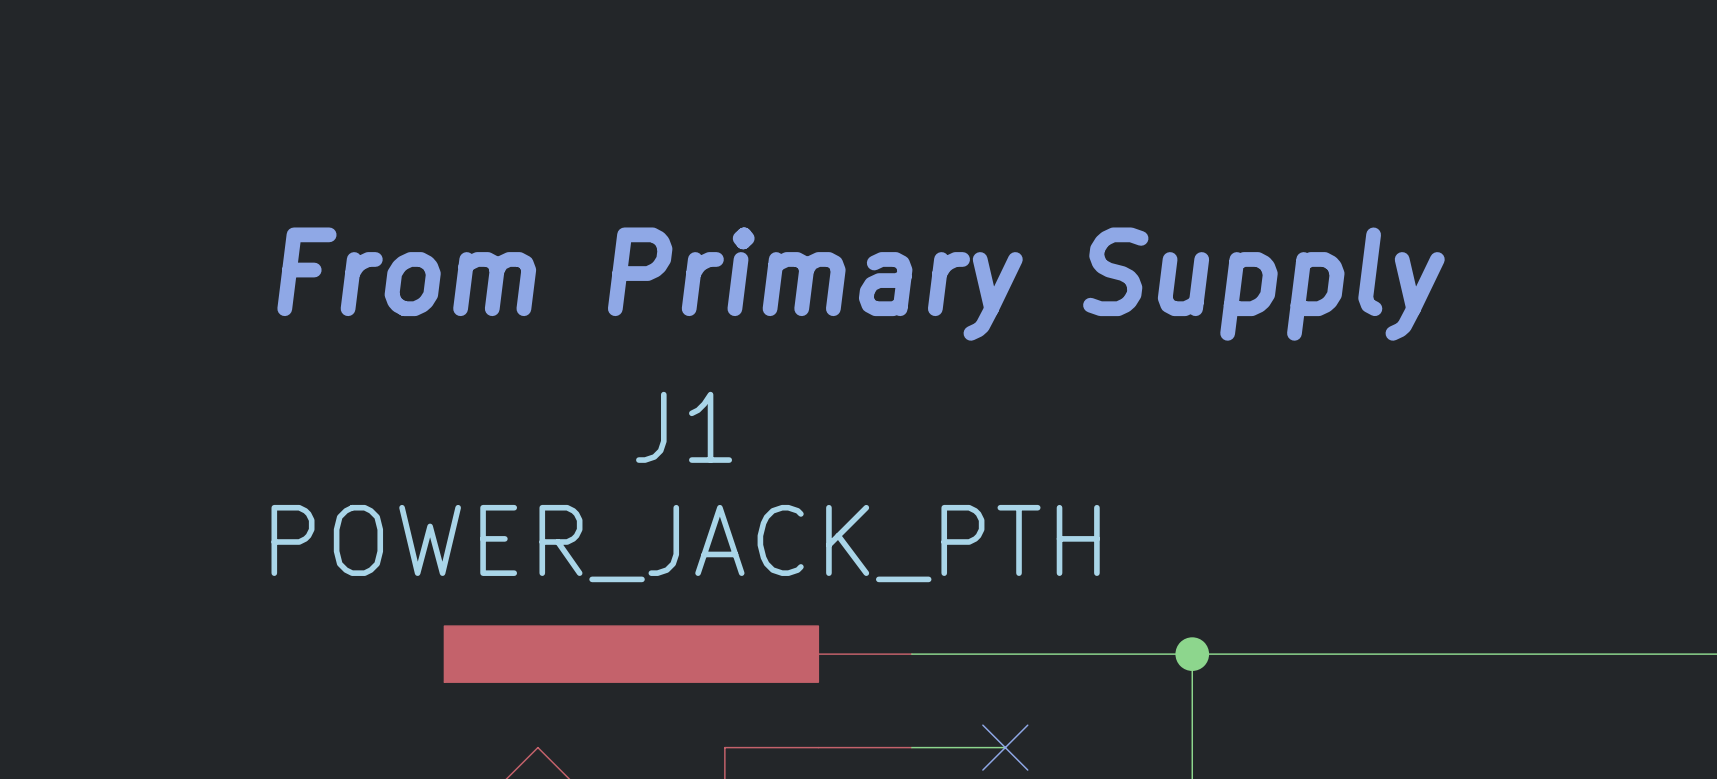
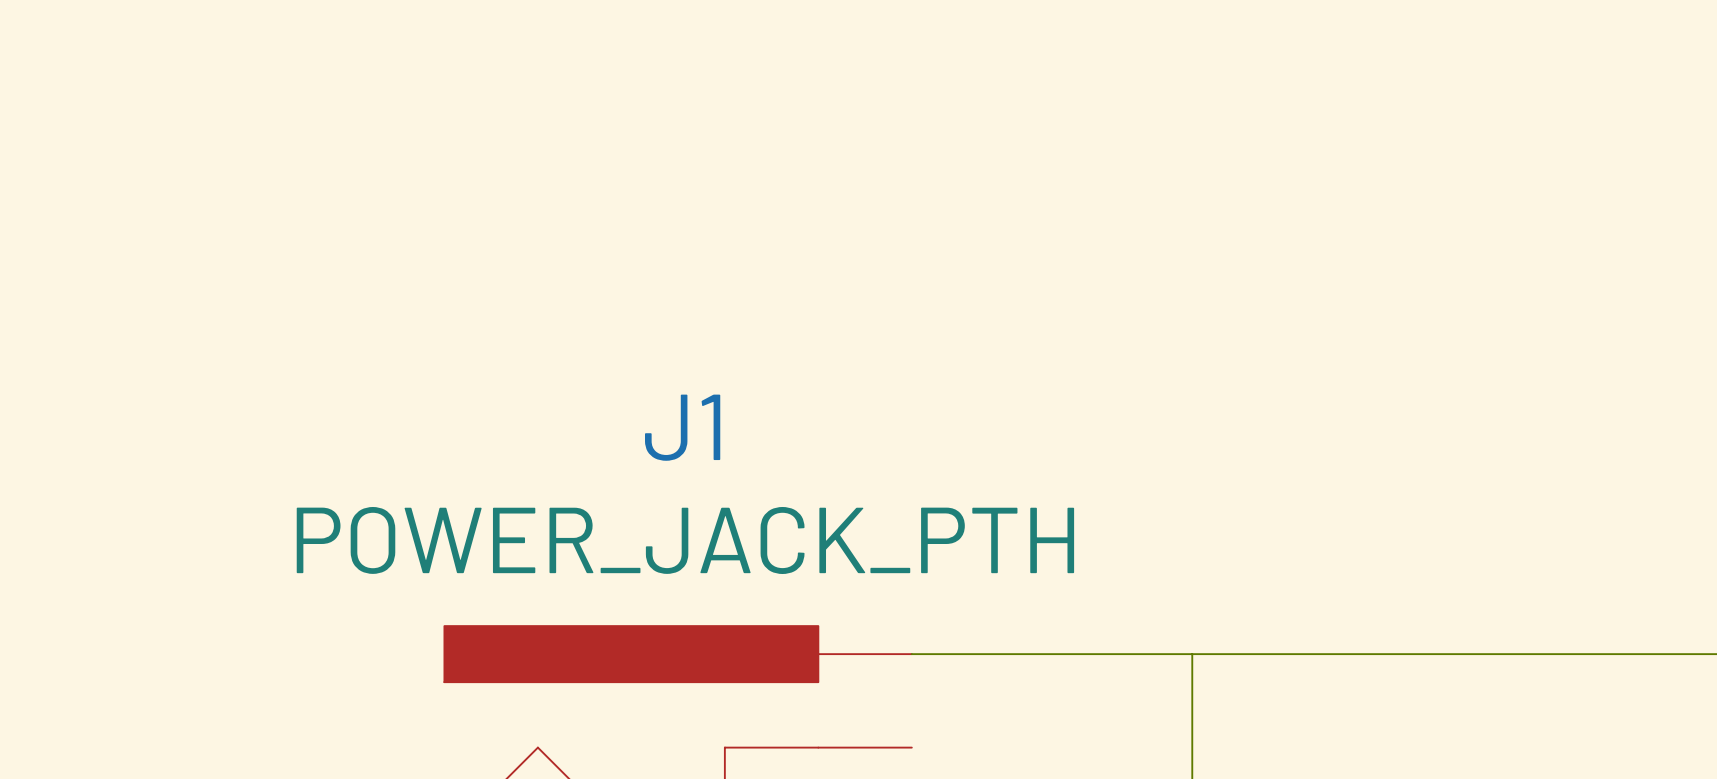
text: From Primary Supply (861, 284) -> none
junction: (1192, 654) -> none
wire: (911, 747) (1005, 747) -> none
no-connect mark: (1005, 747) -> none

